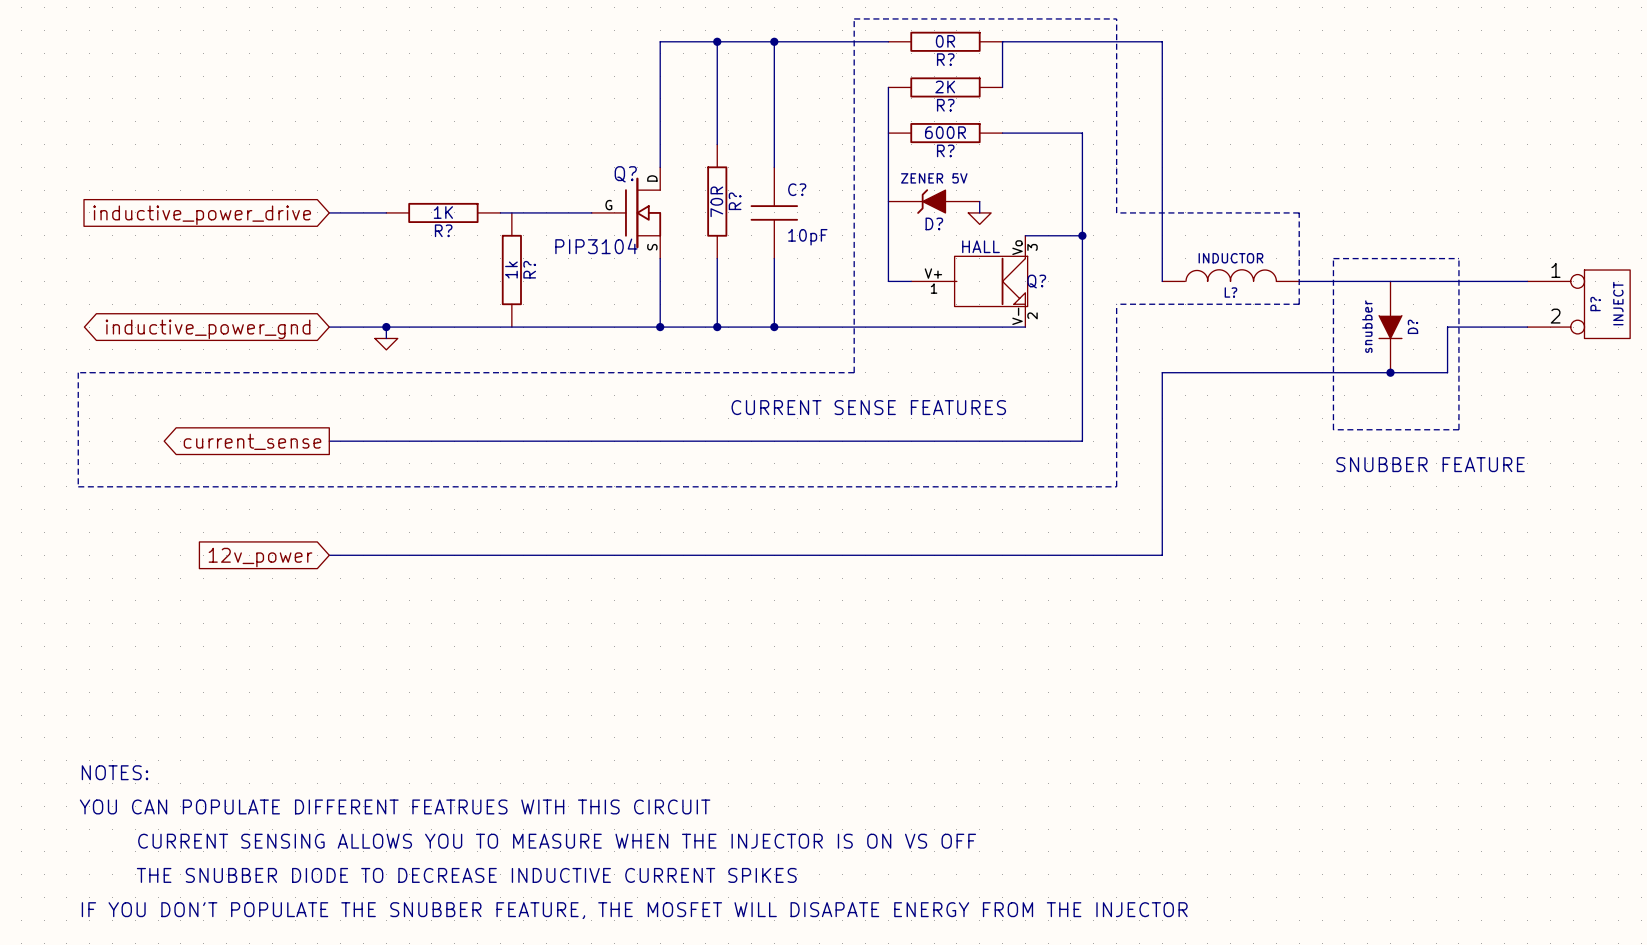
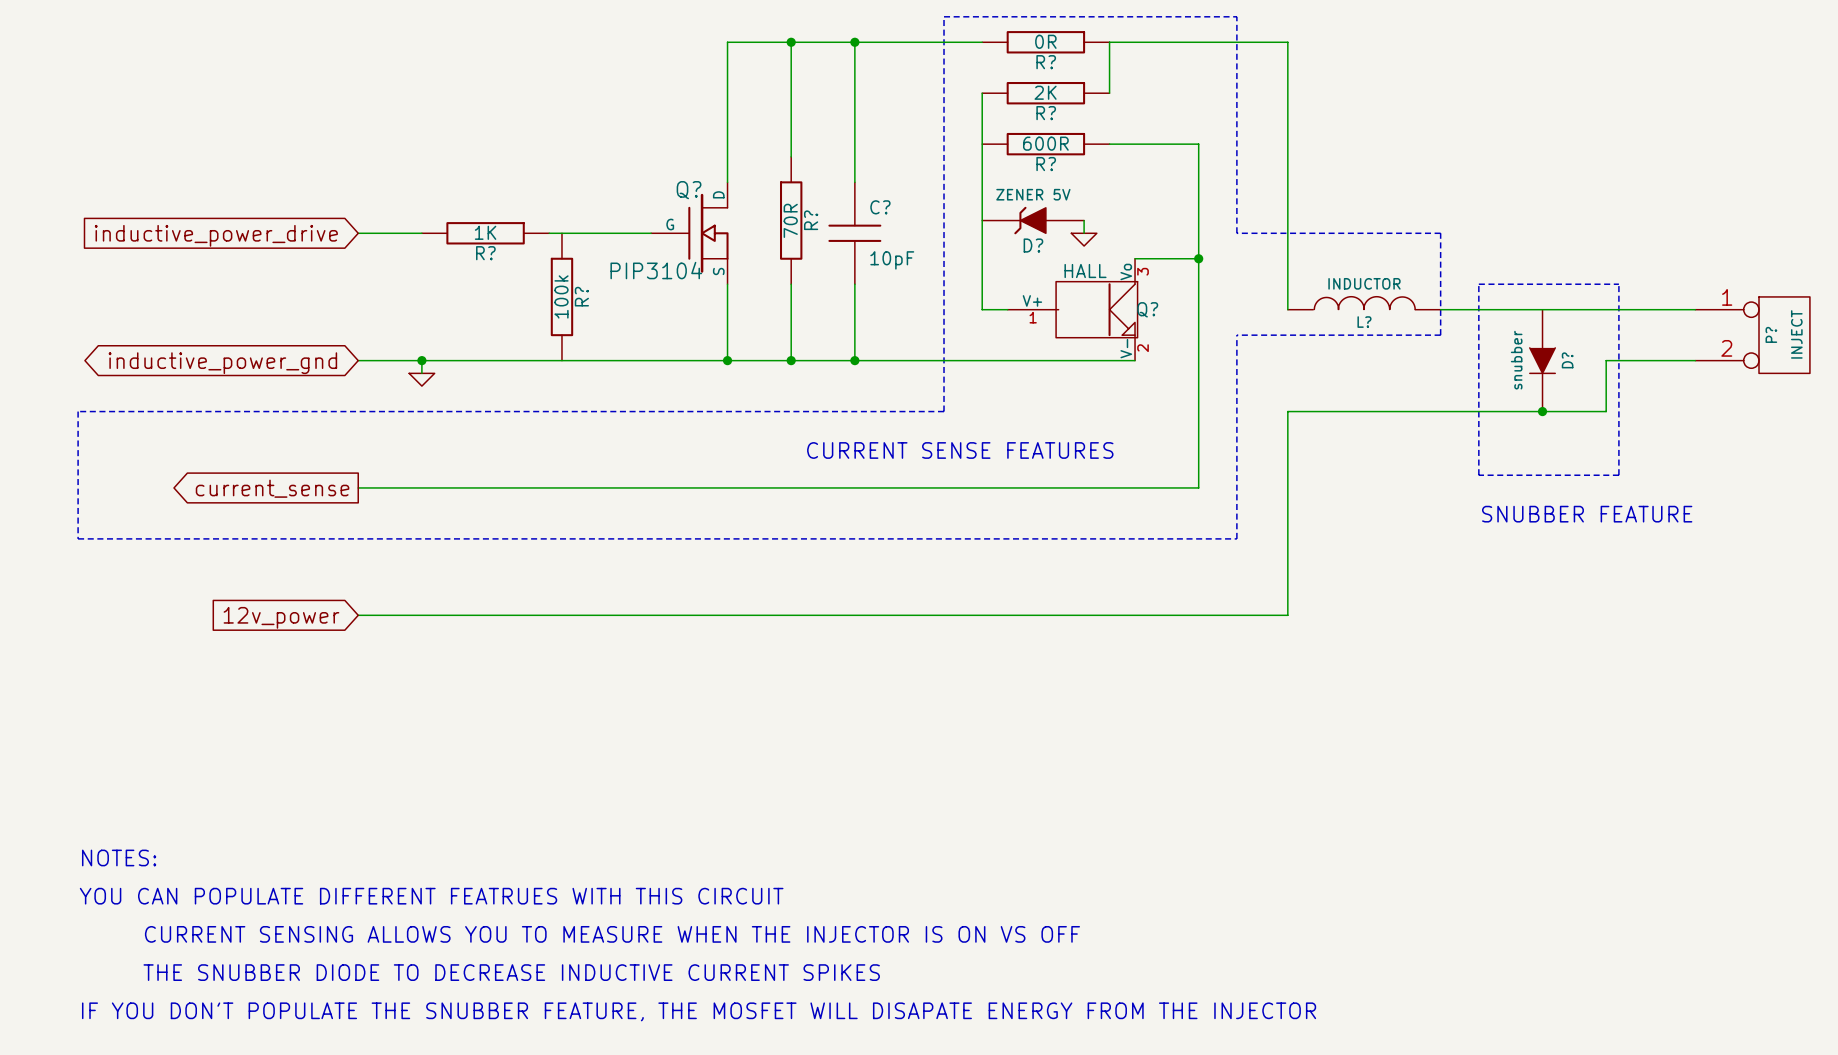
R? value: 1k (511, 270) -> 100k (561, 296)

